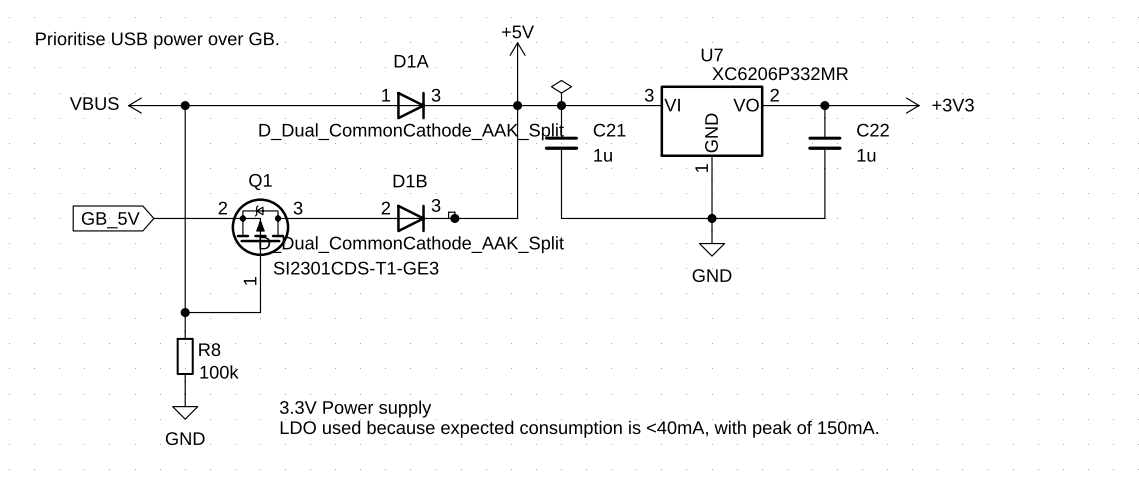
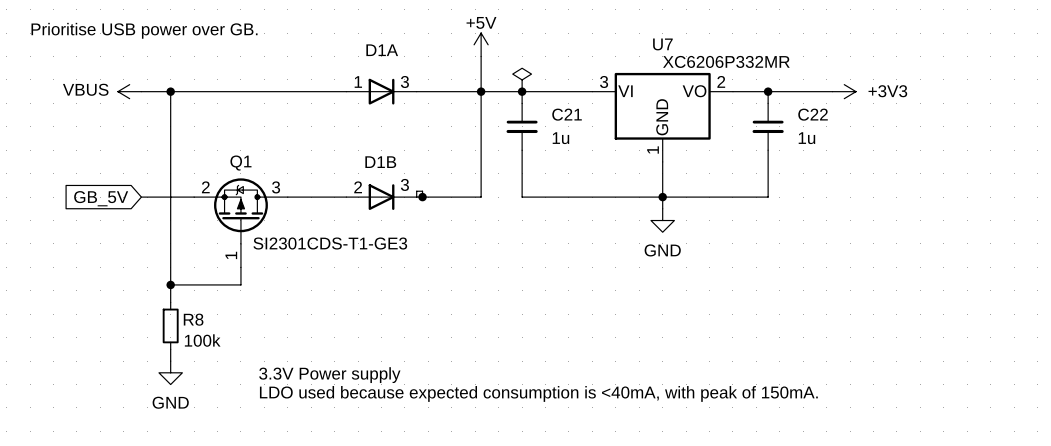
D1A value: D_Dual_CommonCathode_AAK_Split (411, 131) -> none
D1B value: D_Dual_CommonCathode_AAK_Split (411, 244) -> none

